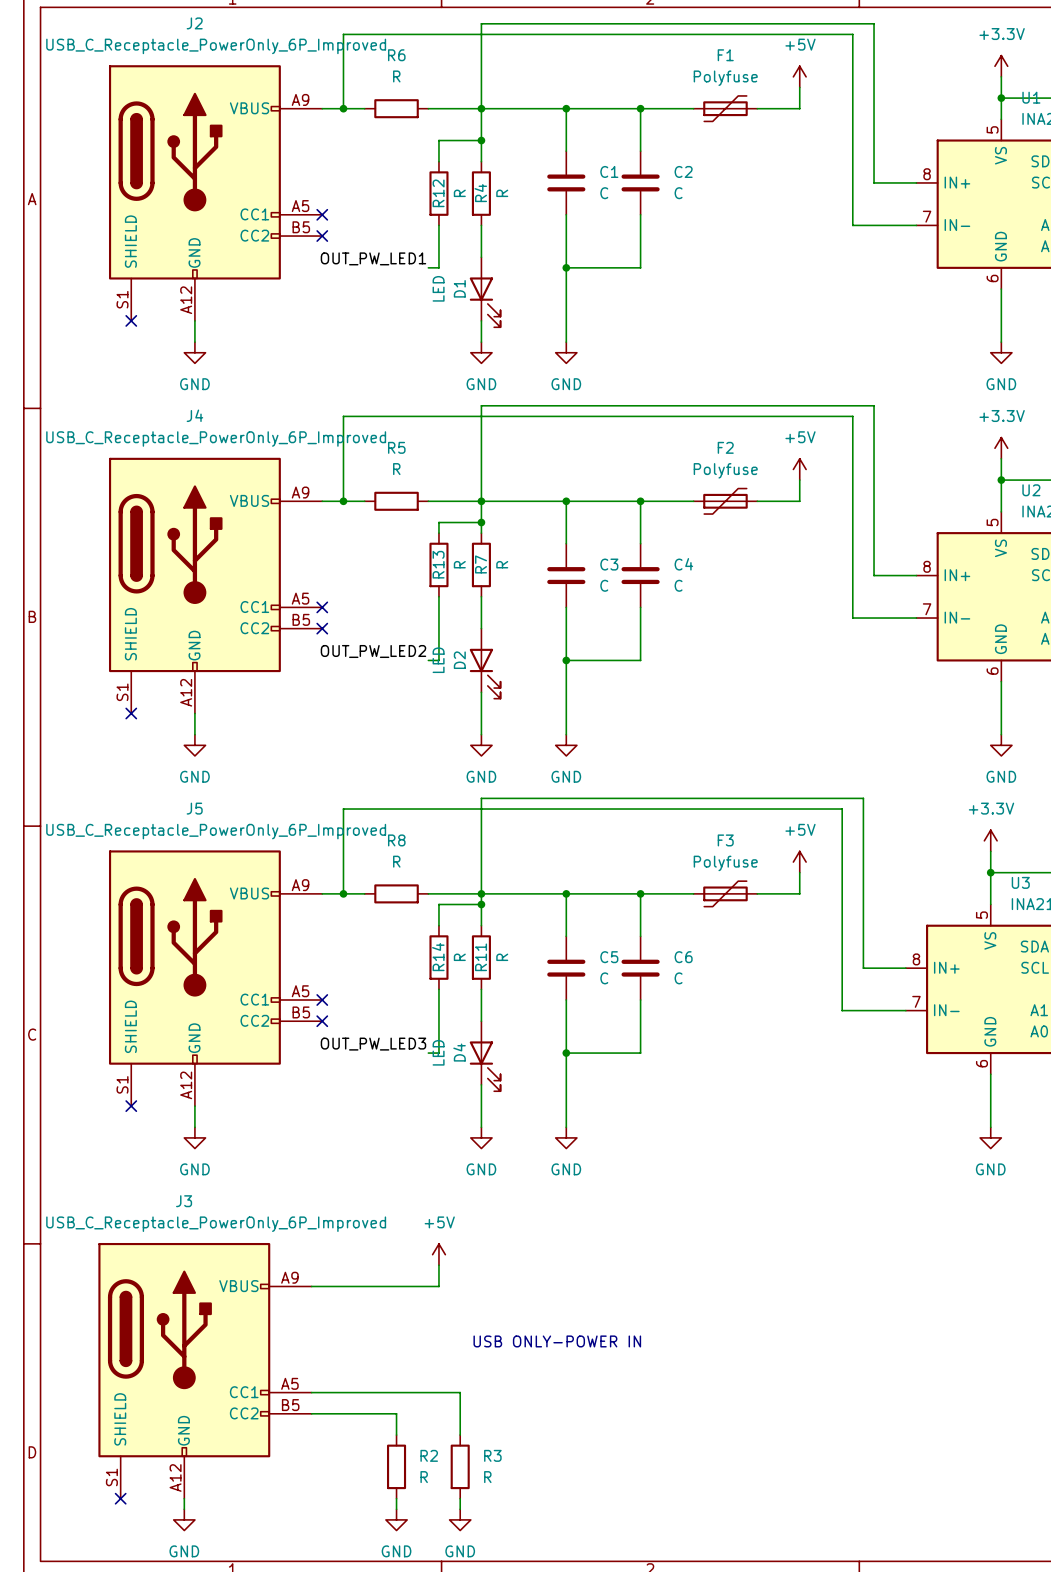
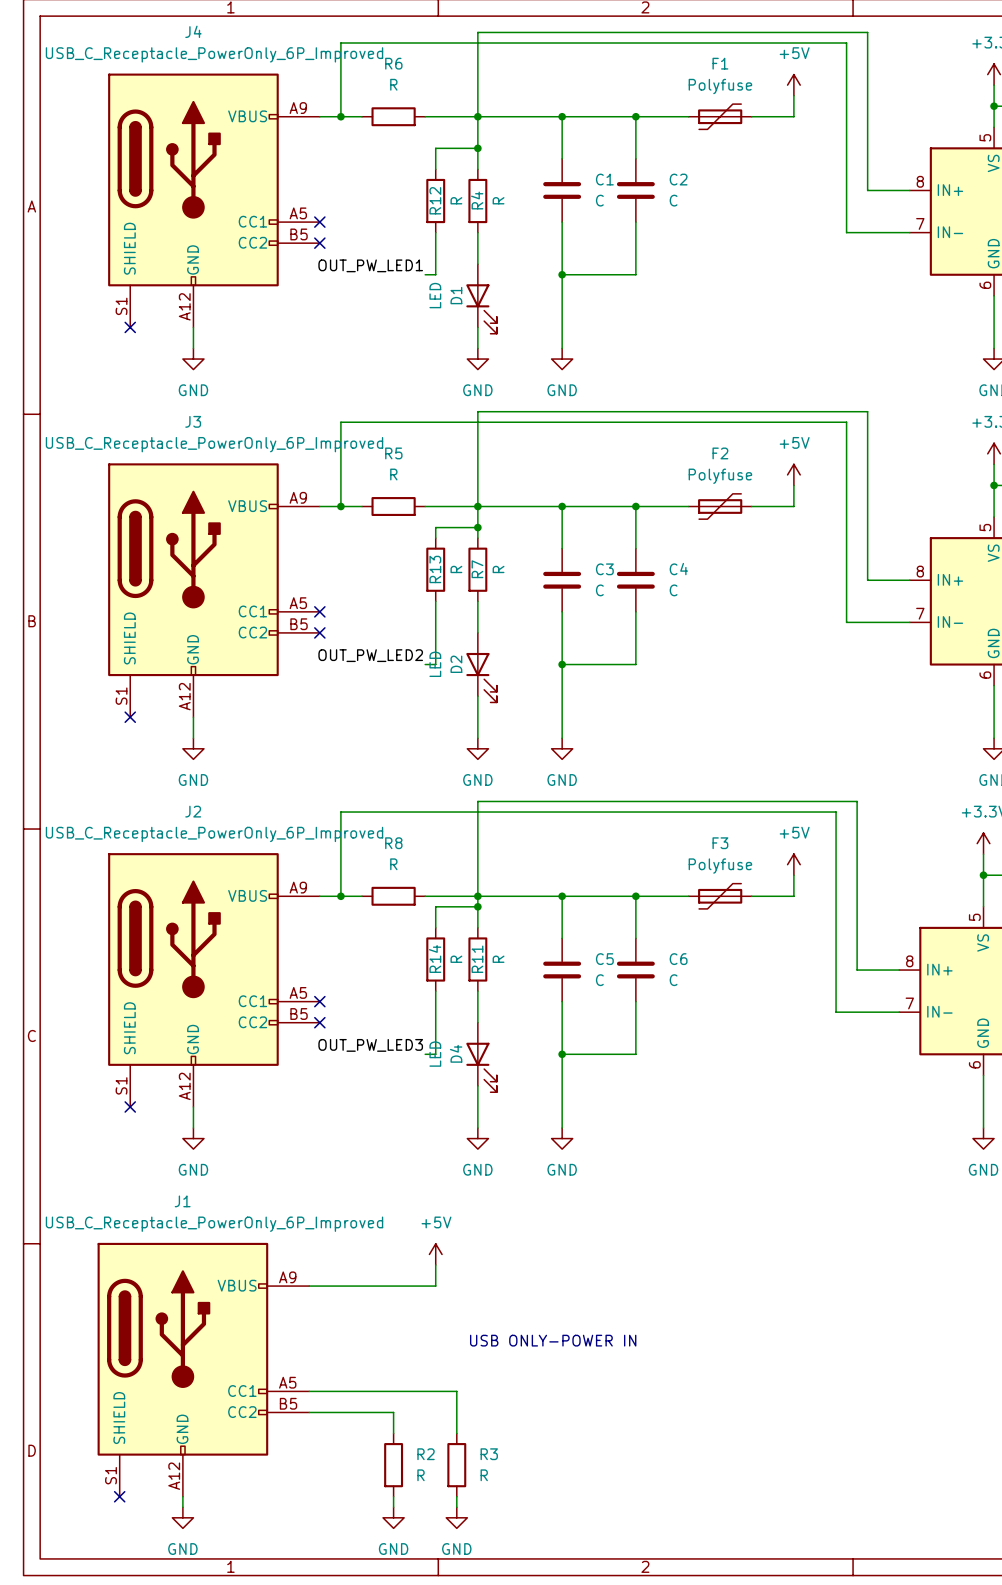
J2 name: J2 (194, 23) -> J4 (193, 31)
J4 name: J4 (194, 415) -> J3 (193, 421)
J5 name: J5 (194, 808) -> J2 (193, 811)
J3 name: J3 (184, 1201) -> J1 (182, 1201)

